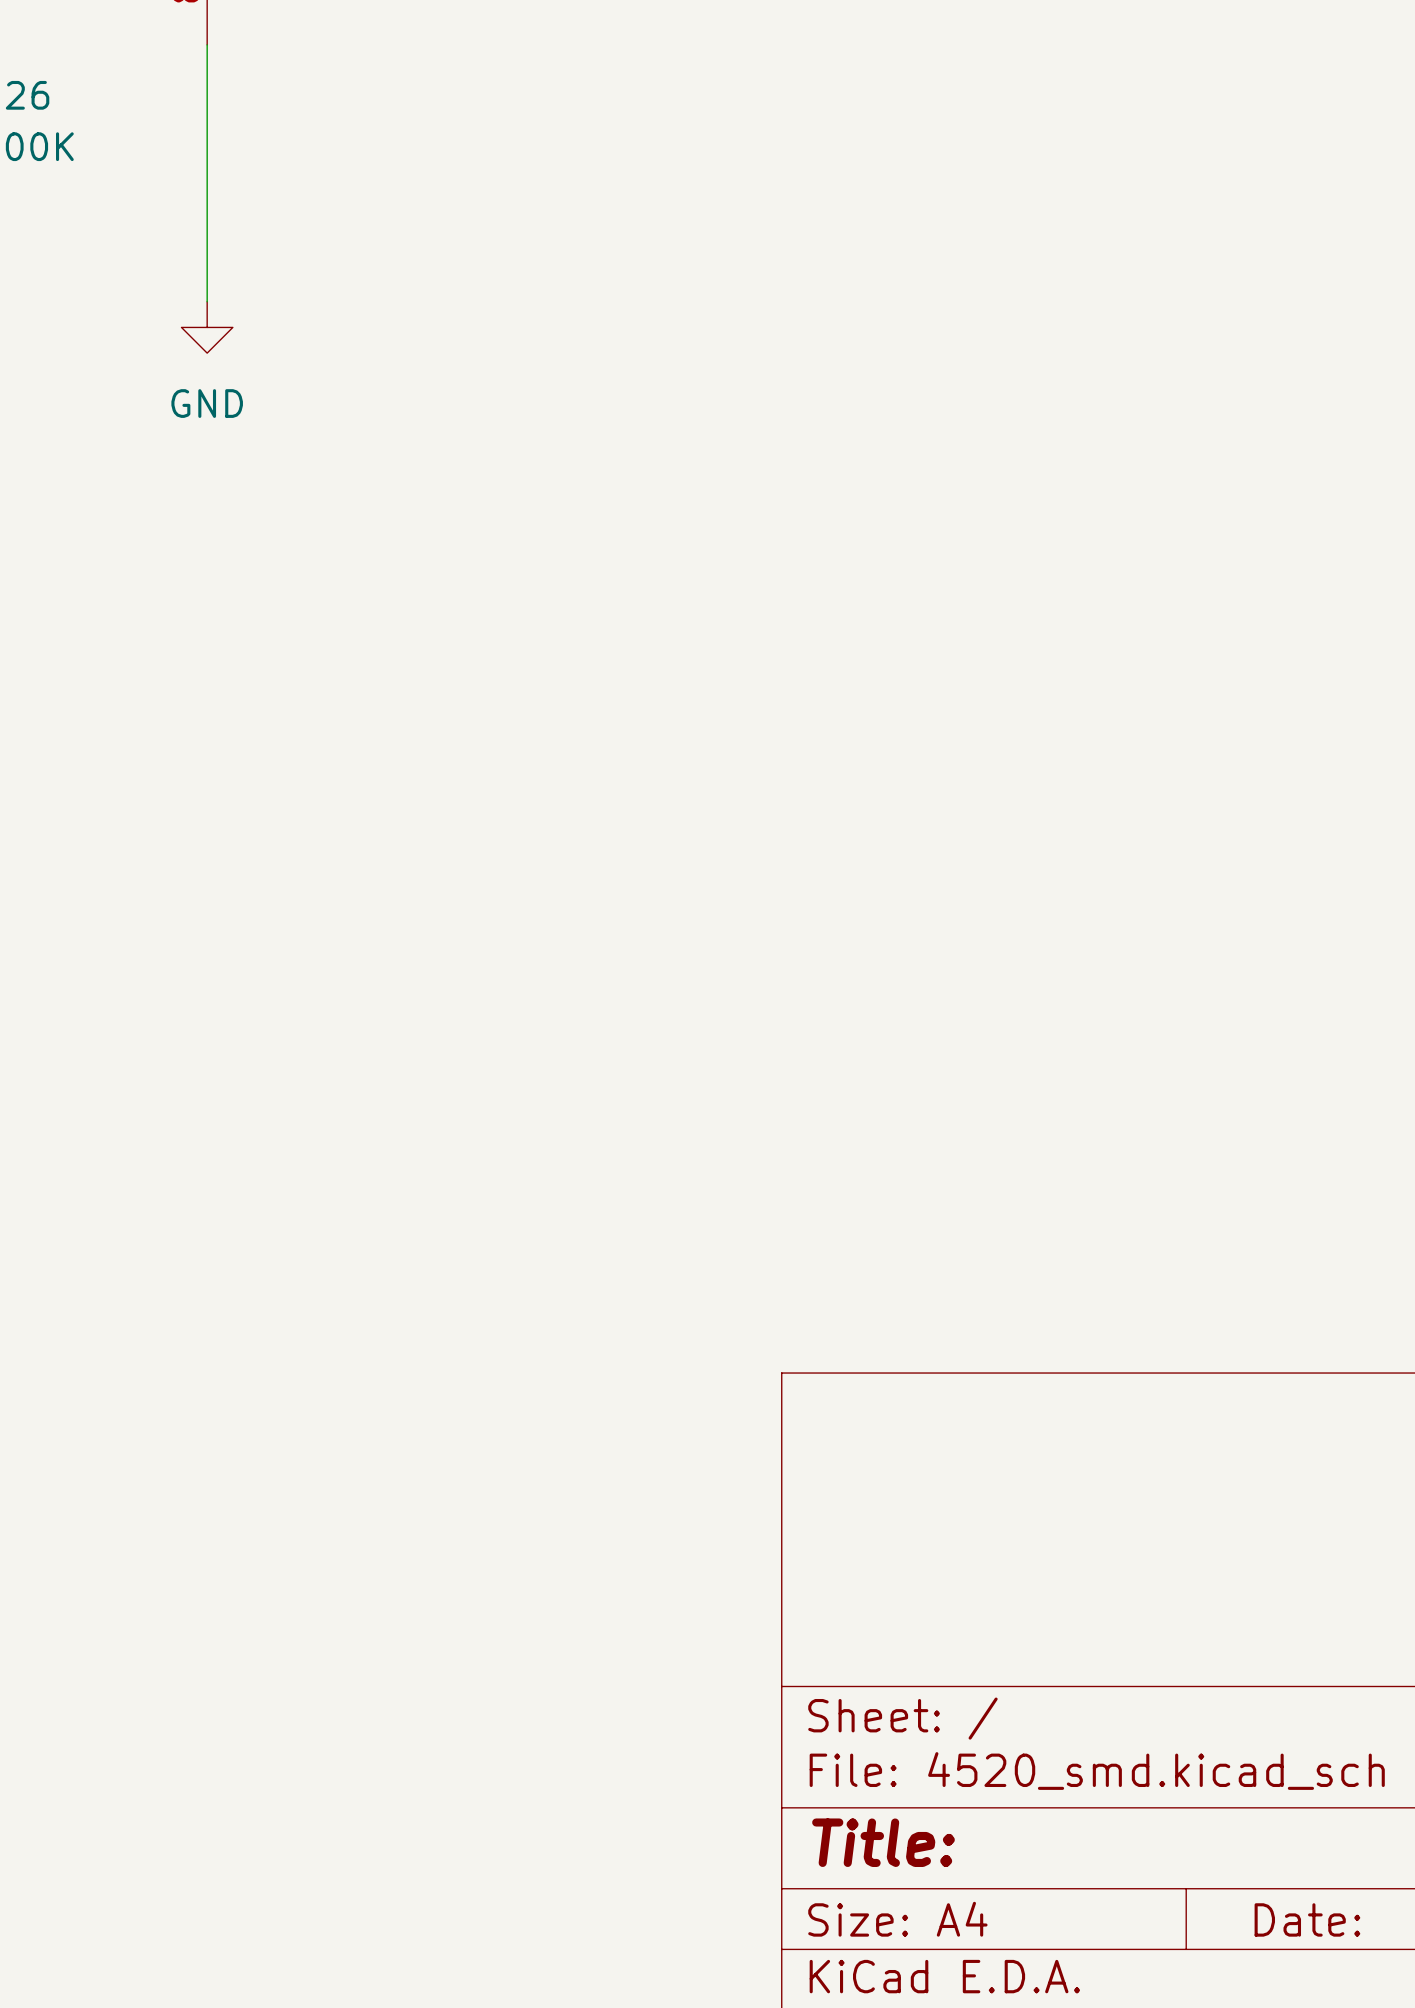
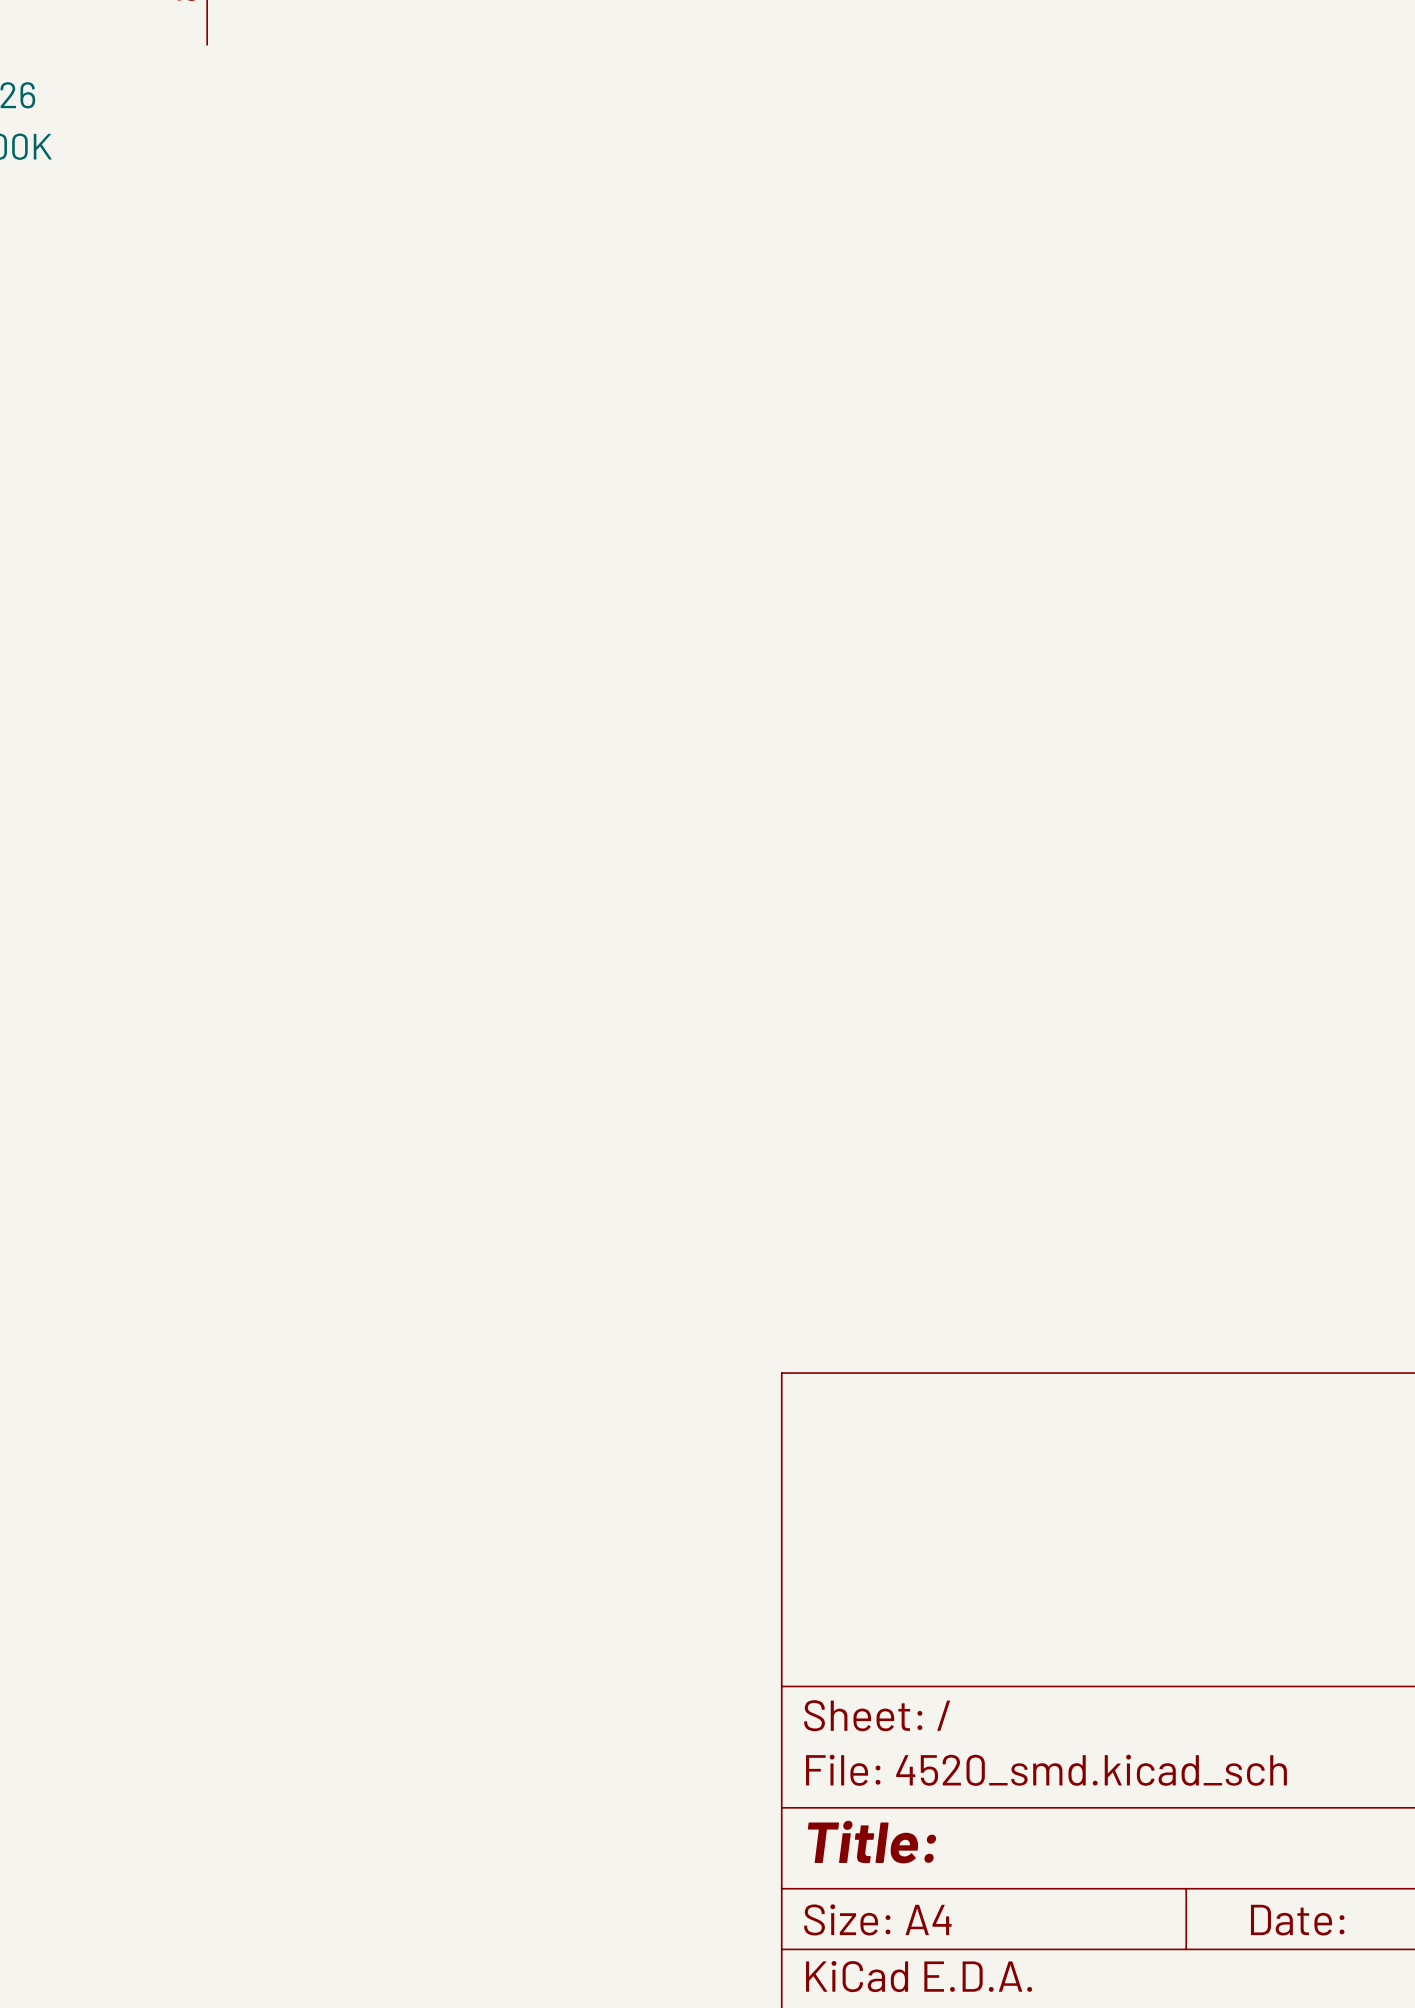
wire: (207, 44) (207, 301) -> none
power symbol: GND (207, 327) -> none

